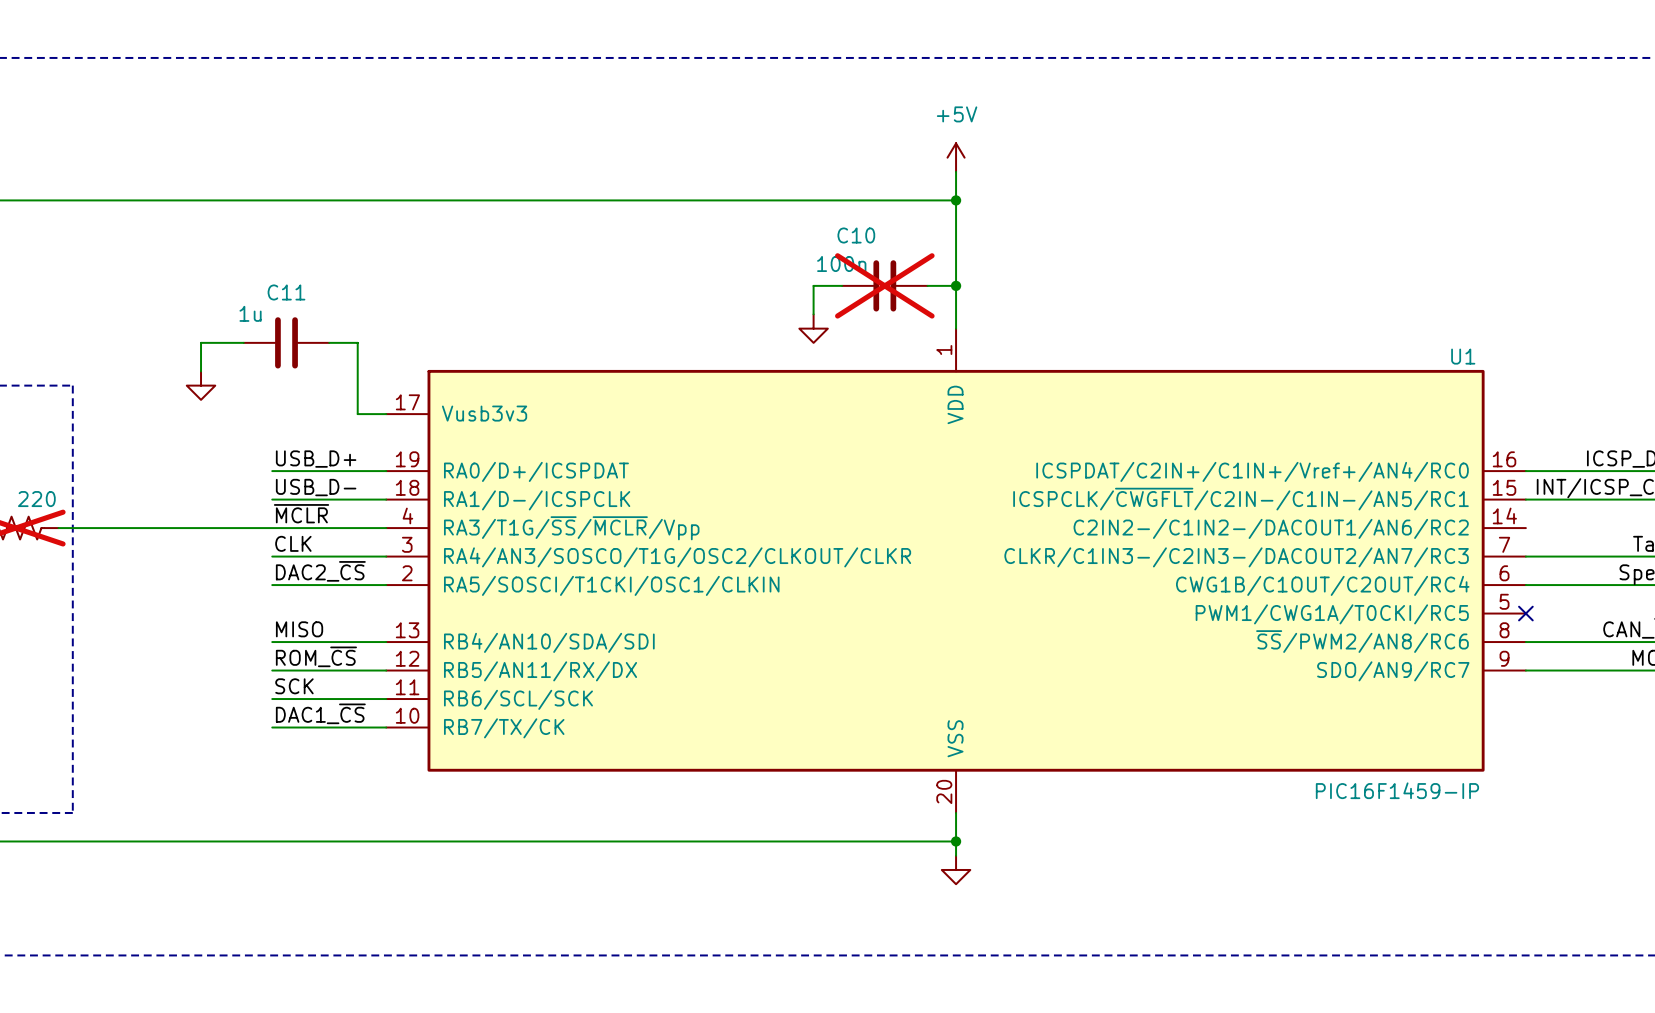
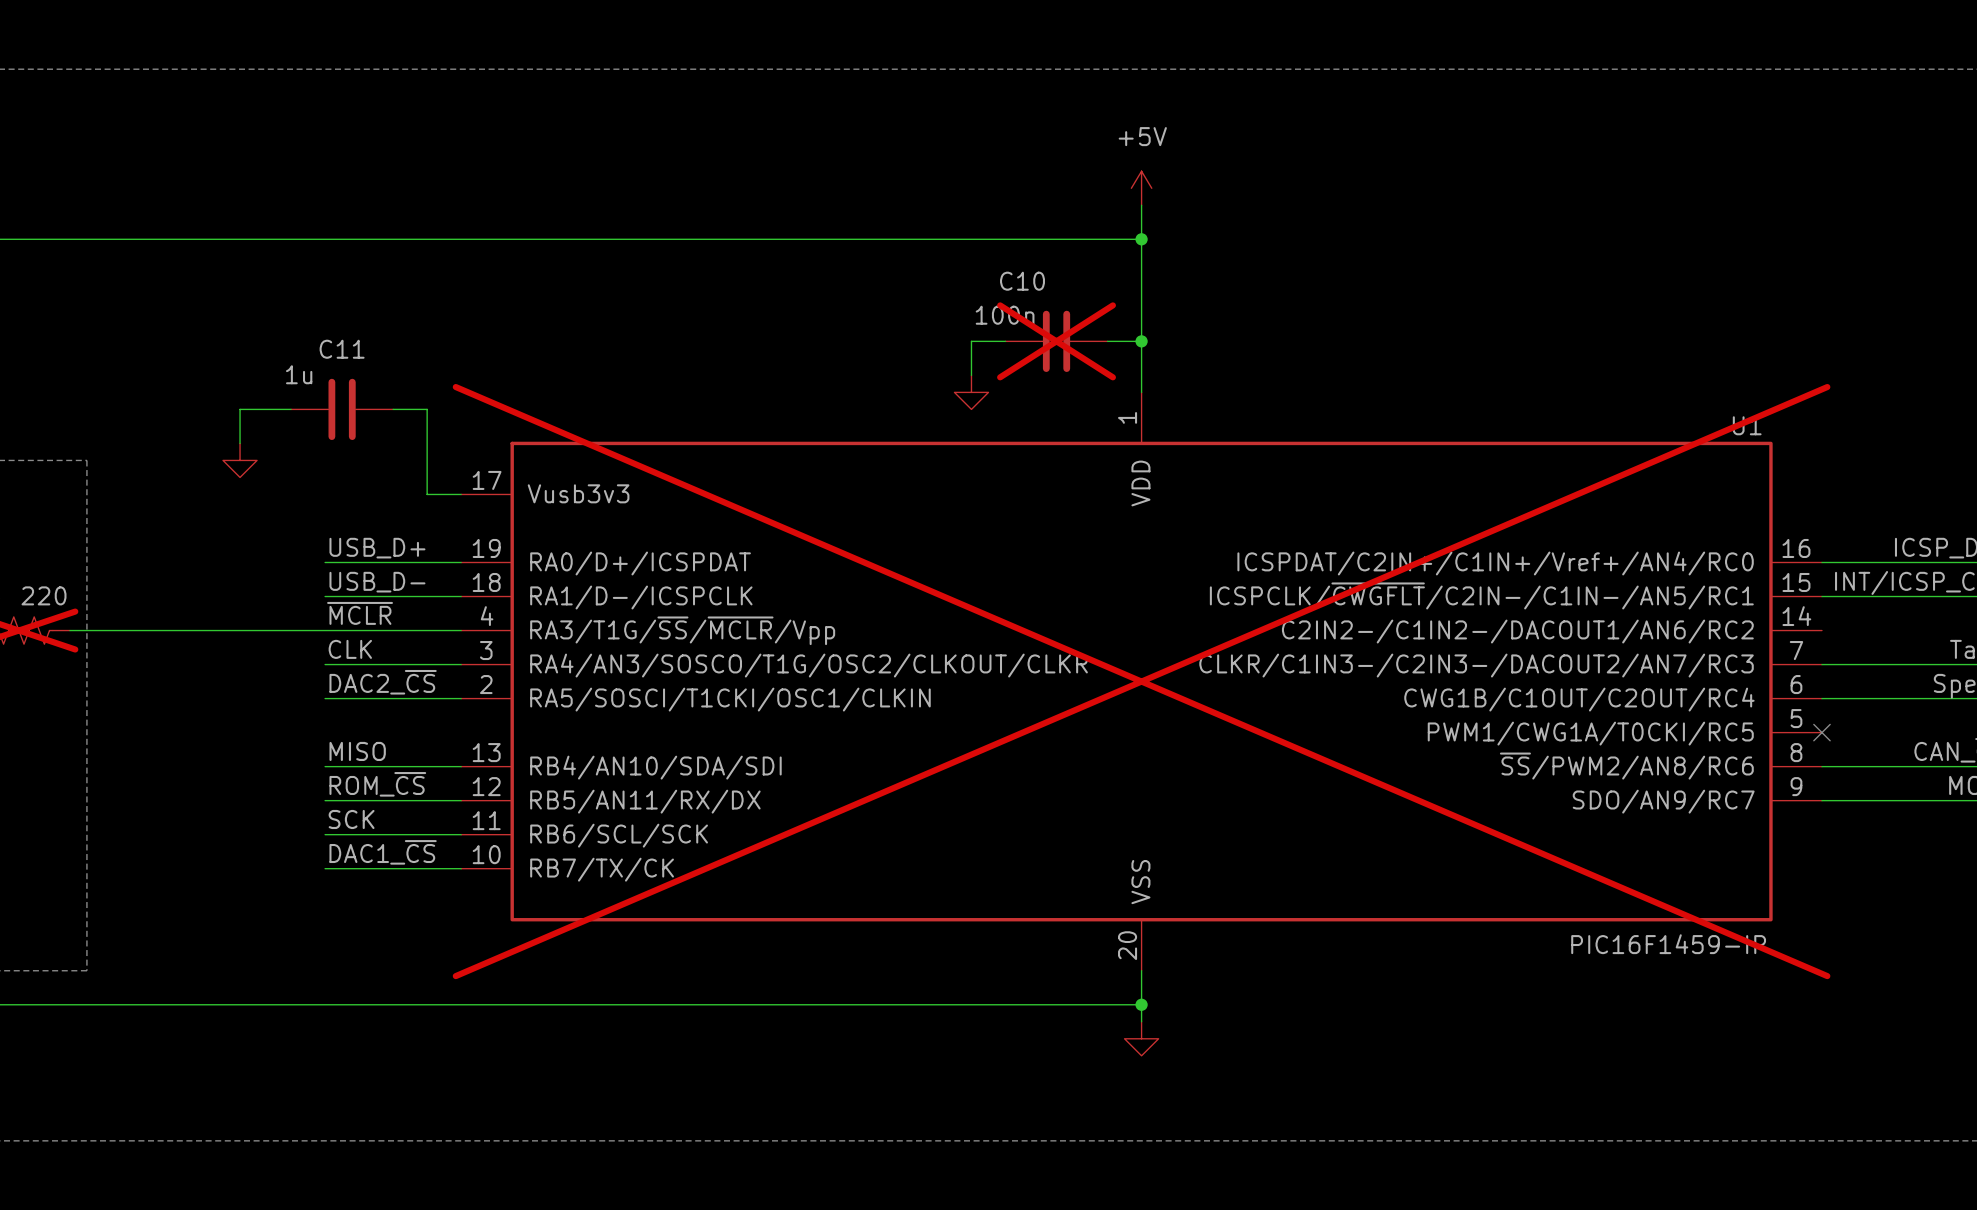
U1 do-not-place cross: none -> (1141, 681)

